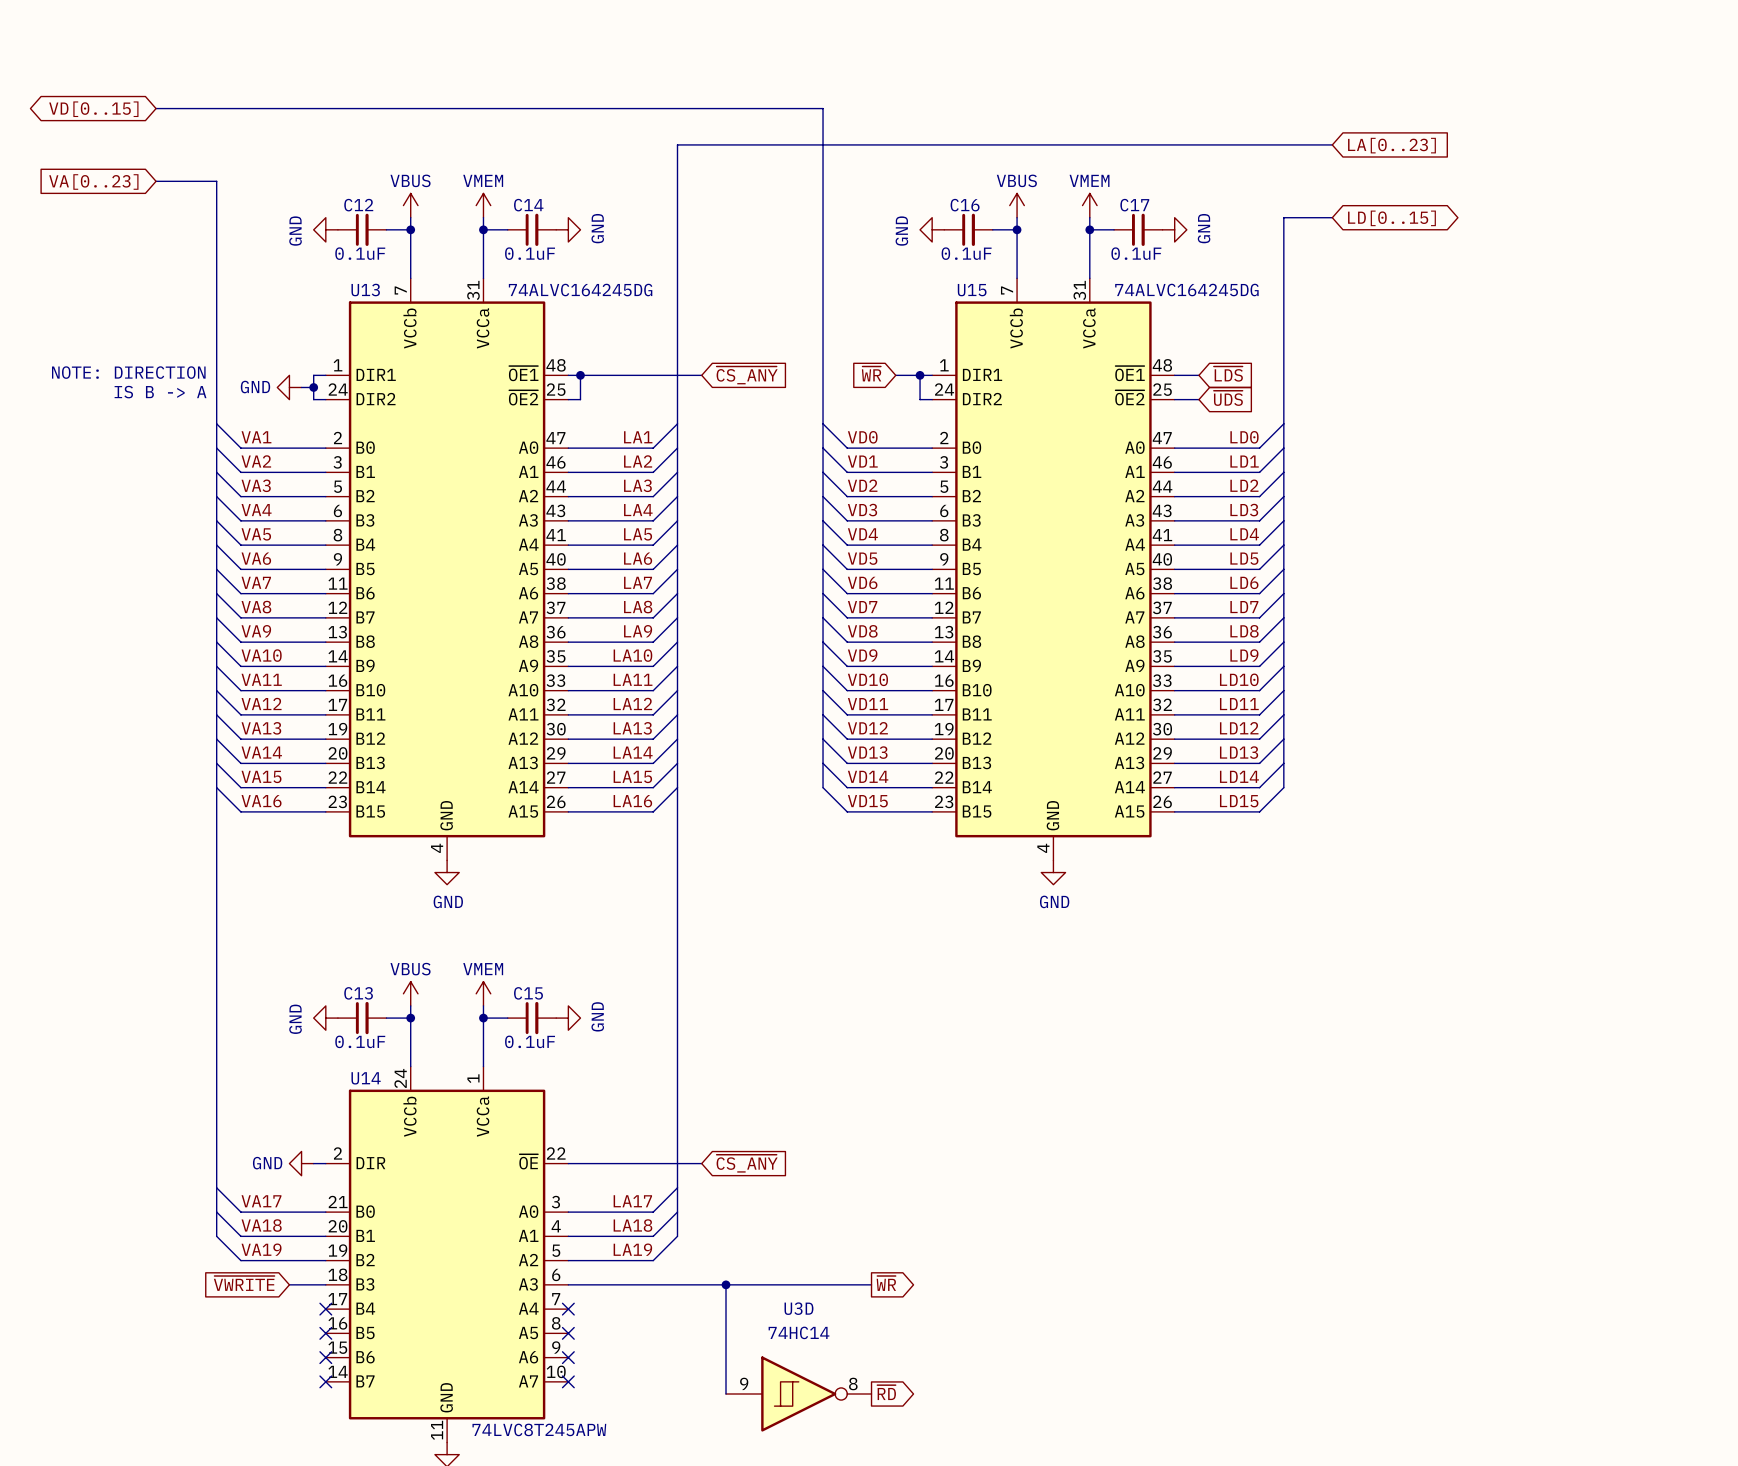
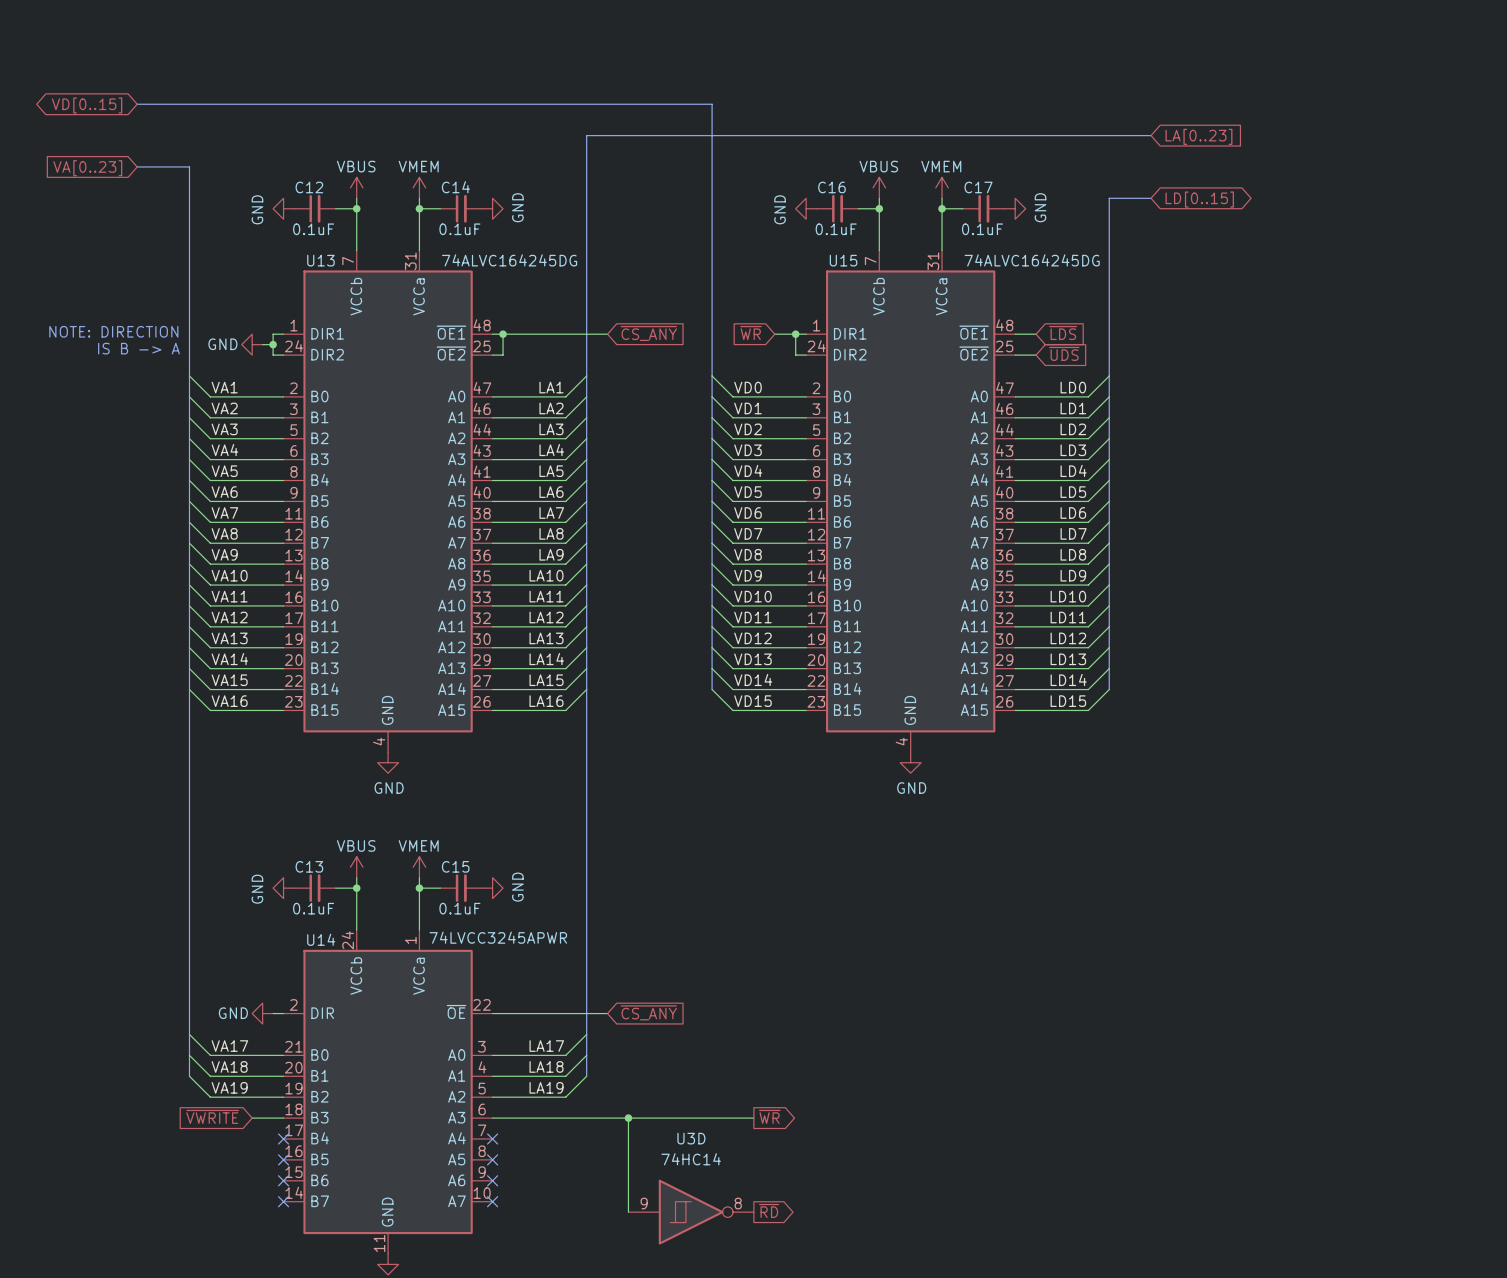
U14 value: 74LVC8T245APW (539, 1429) -> 74LVCC3245APWR (498, 937)

